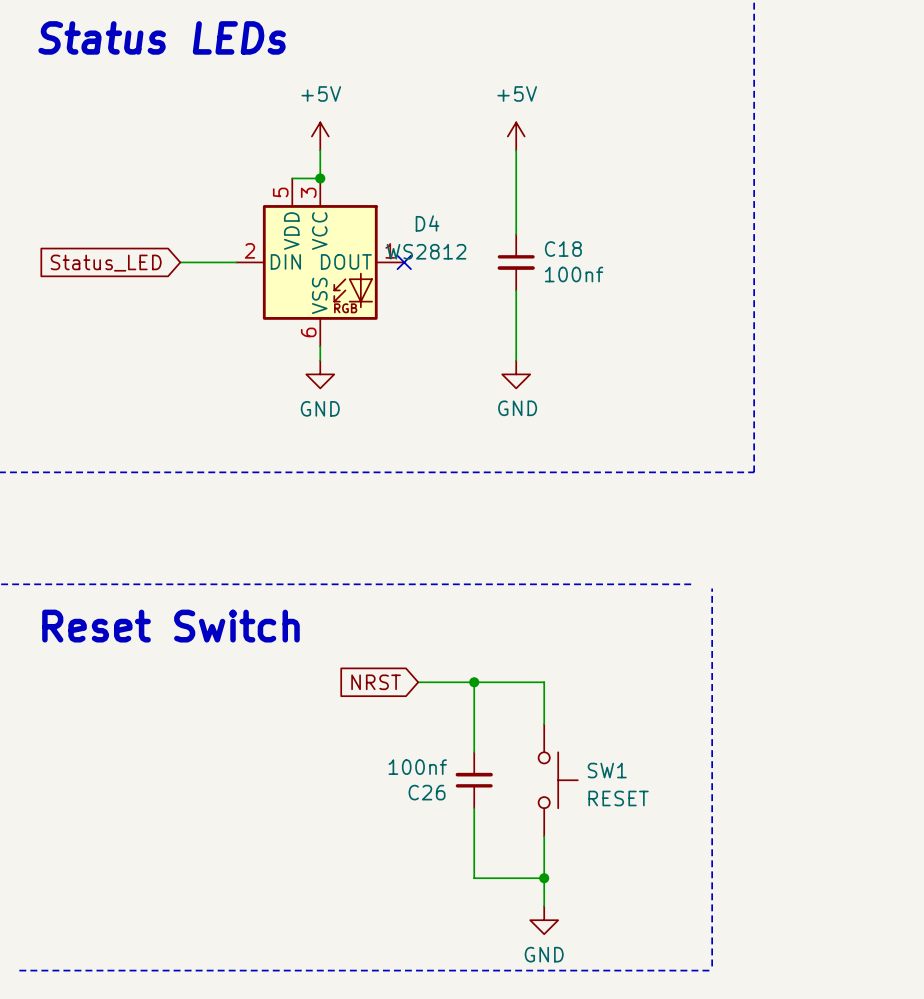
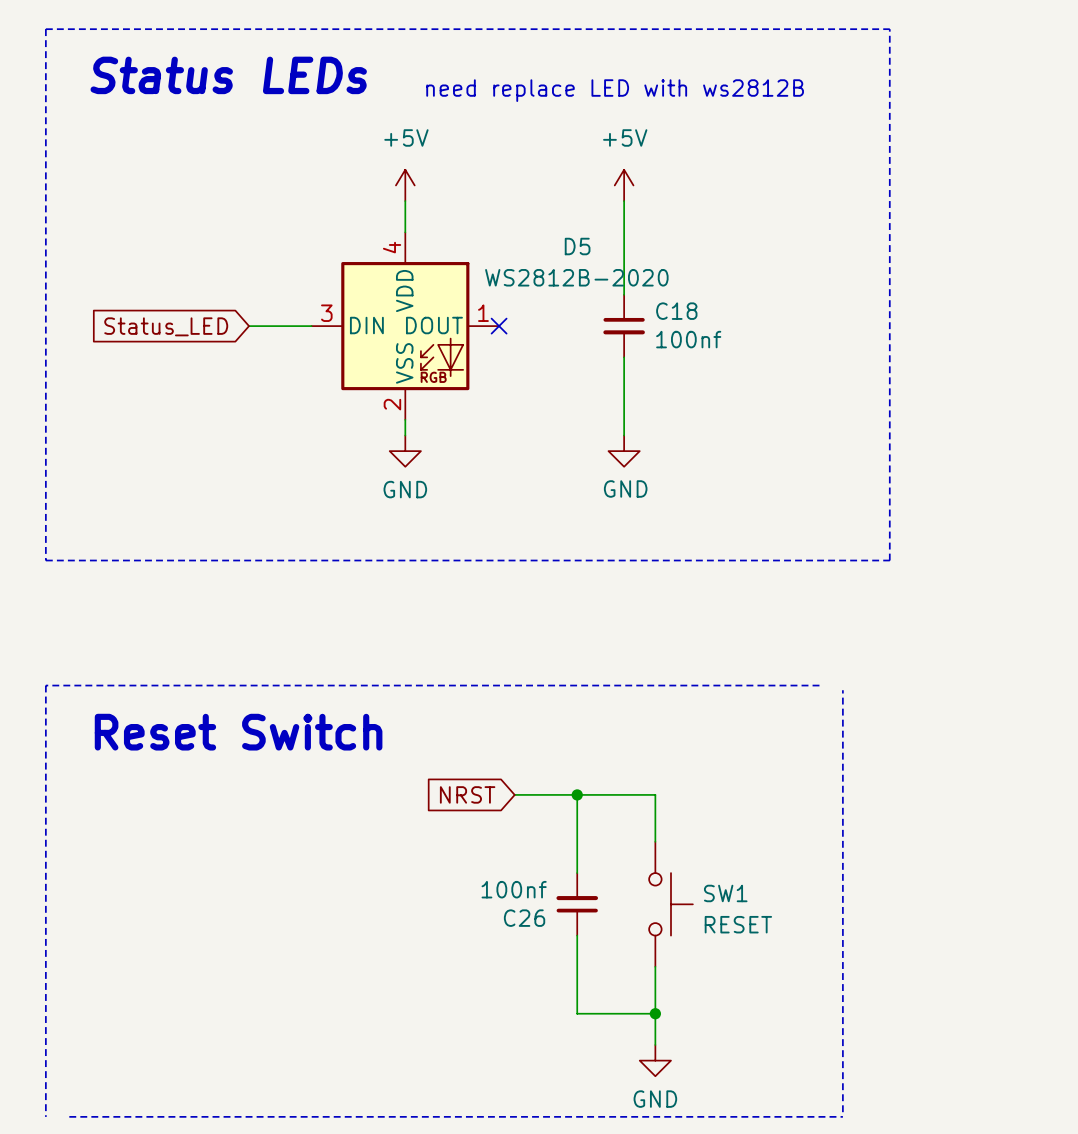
text: none -> need replace LED with ws2812B (615, 90)
wire: (292, 178) (320, 178) -> none
junction: (320, 178) -> none
D4: WS2812 (320, 262) -> none
D5: none -> WS2812B-2020 (405, 326)

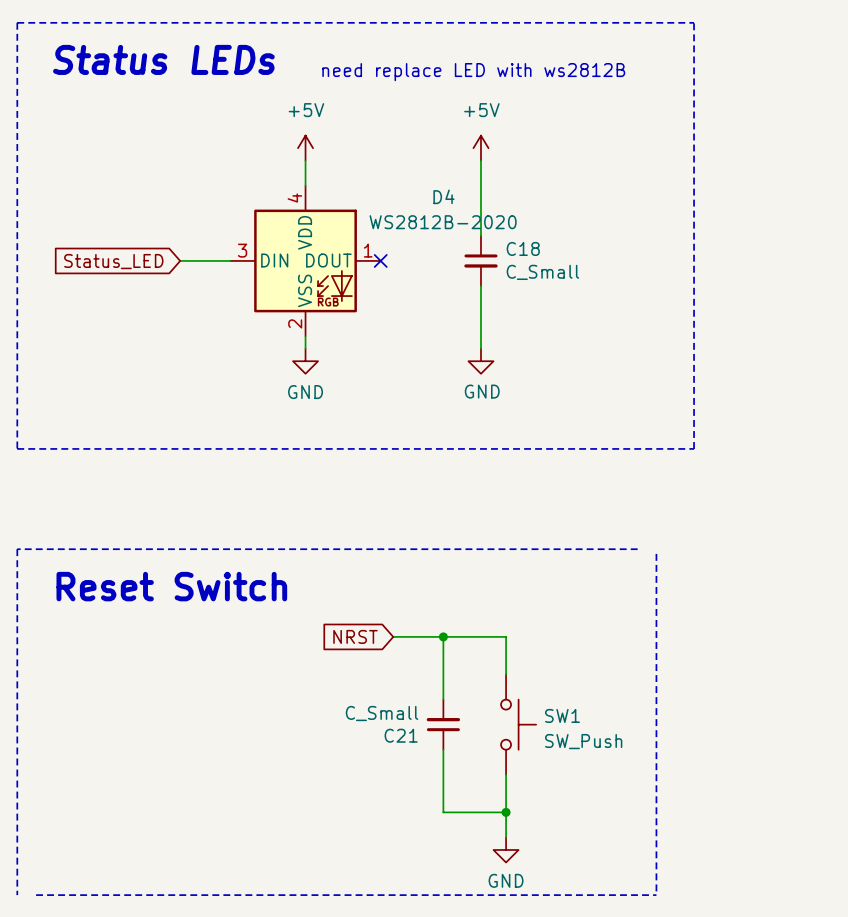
D5 name: D5 (577, 246) -> D4 (443, 196)
C18 value: 100nf (688, 339) -> C_Small (542, 272)
C26 value: 100nf (514, 889) -> C_Small (382, 713)
C26 name: C26 (524, 918) -> C21 (401, 735)
SW1 value: RESET (738, 924) -> SW_Push (583, 741)

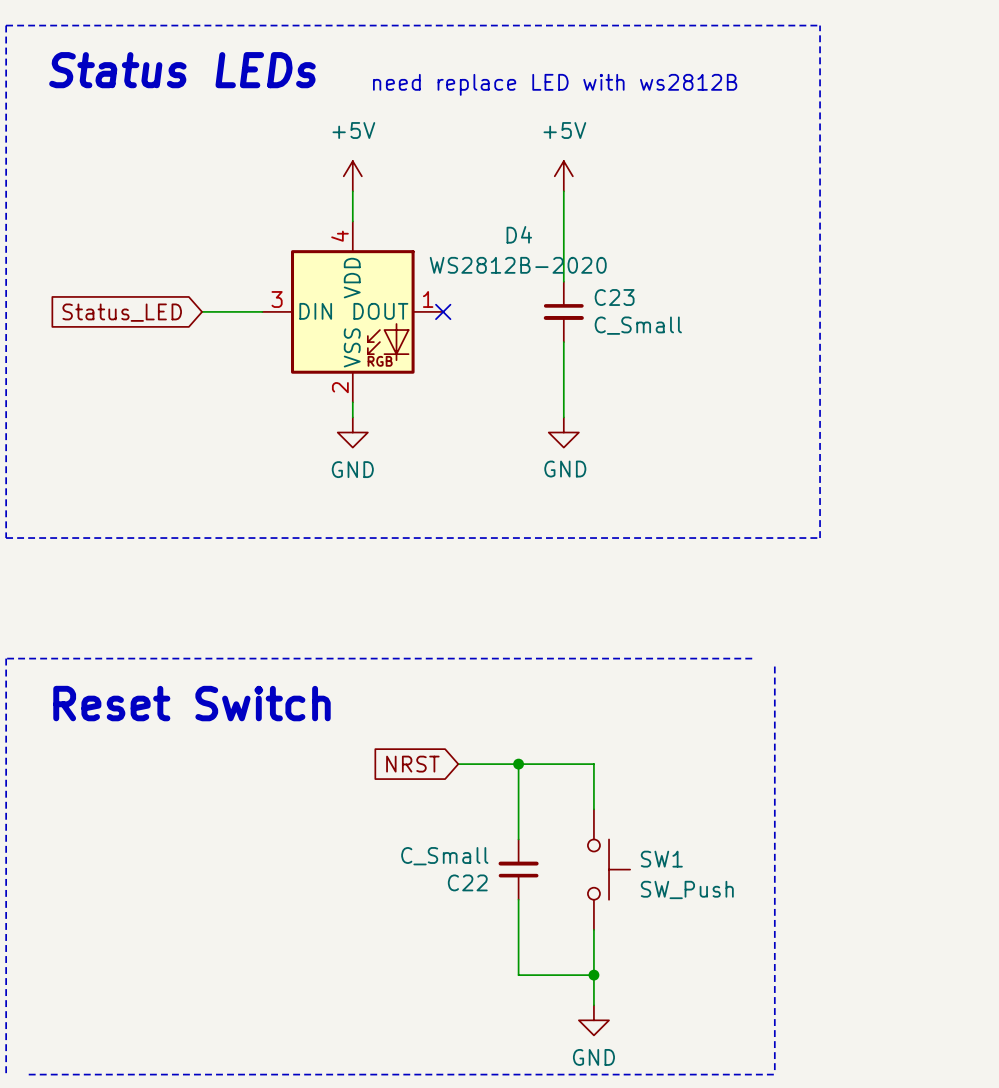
C18 name: C18 (523, 248) -> C23 (614, 297)
C21 name: C21 (401, 735) -> C22 (467, 882)

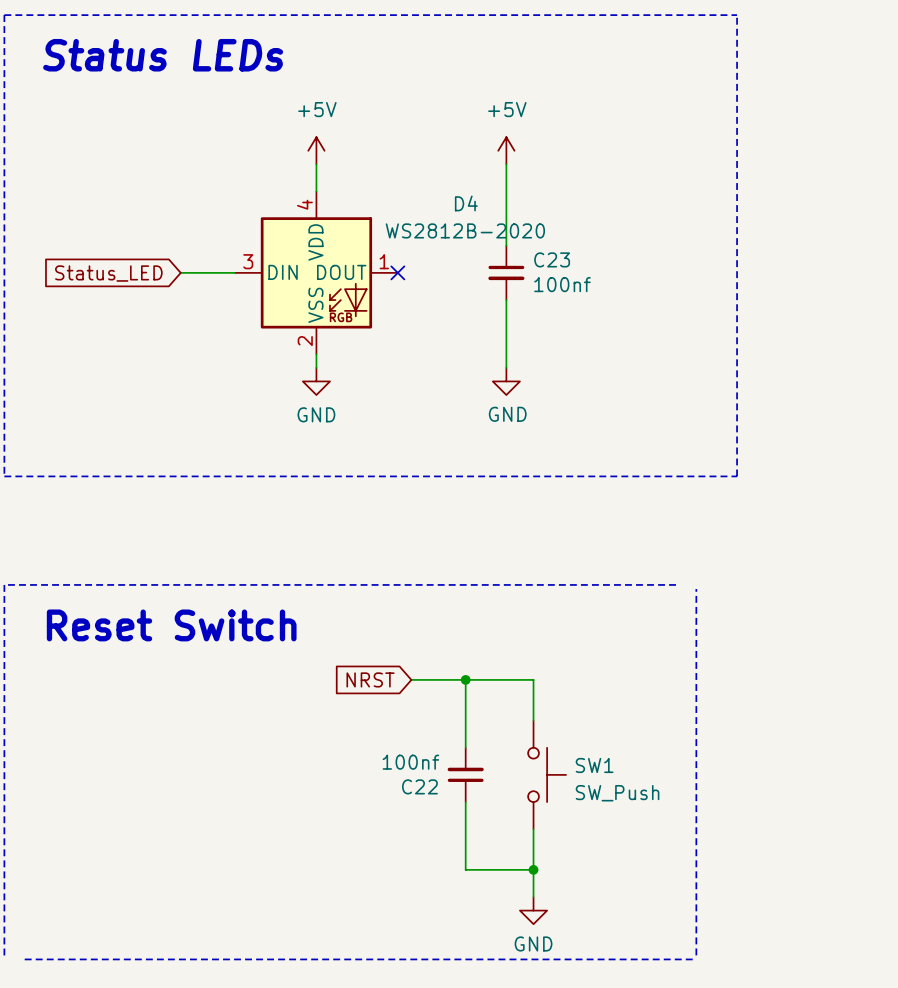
text: need replace LED with ws2812B (555, 84) -> none
C23 value: C_Small (638, 325) -> 100nf (562, 284)
C22 value: C_Small (444, 856) -> 100nf (410, 762)

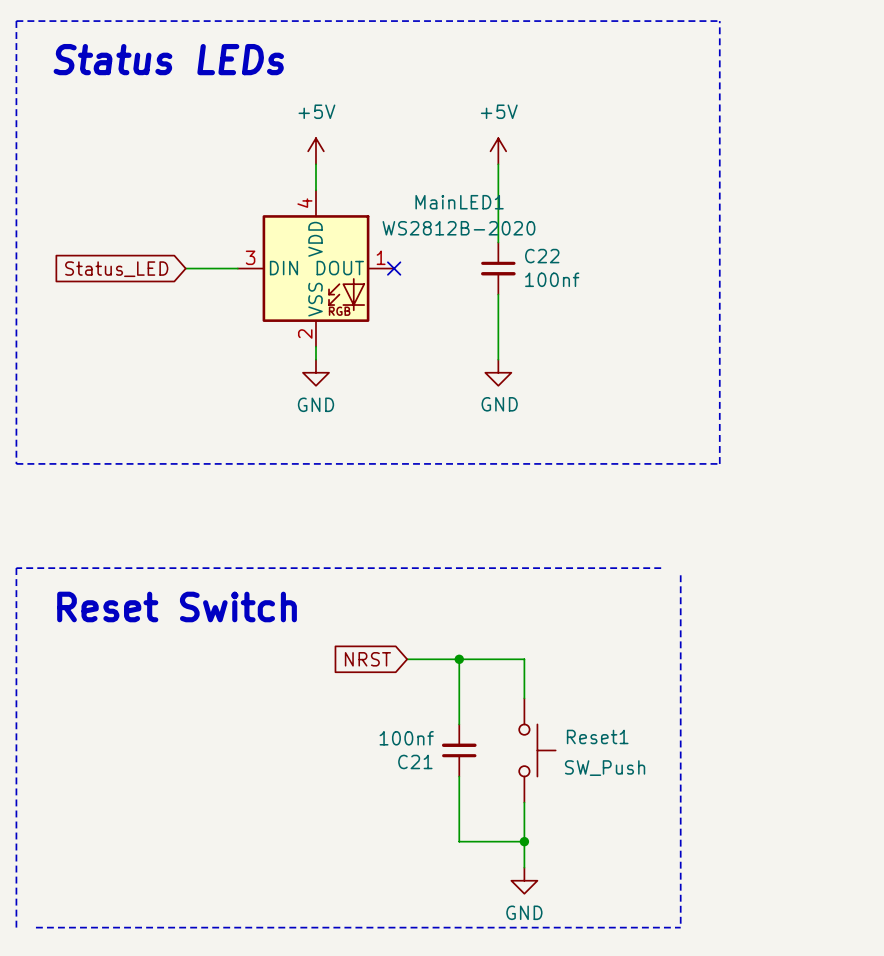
D4 name: D4 (466, 203) -> MainLED1 (459, 202)
C23 name: C23 (552, 259) -> C22 (542, 256)
SW1 name: SW1 (594, 765) -> Reset1 (597, 736)
C22 name: C22 (419, 786) -> C21 (415, 761)

